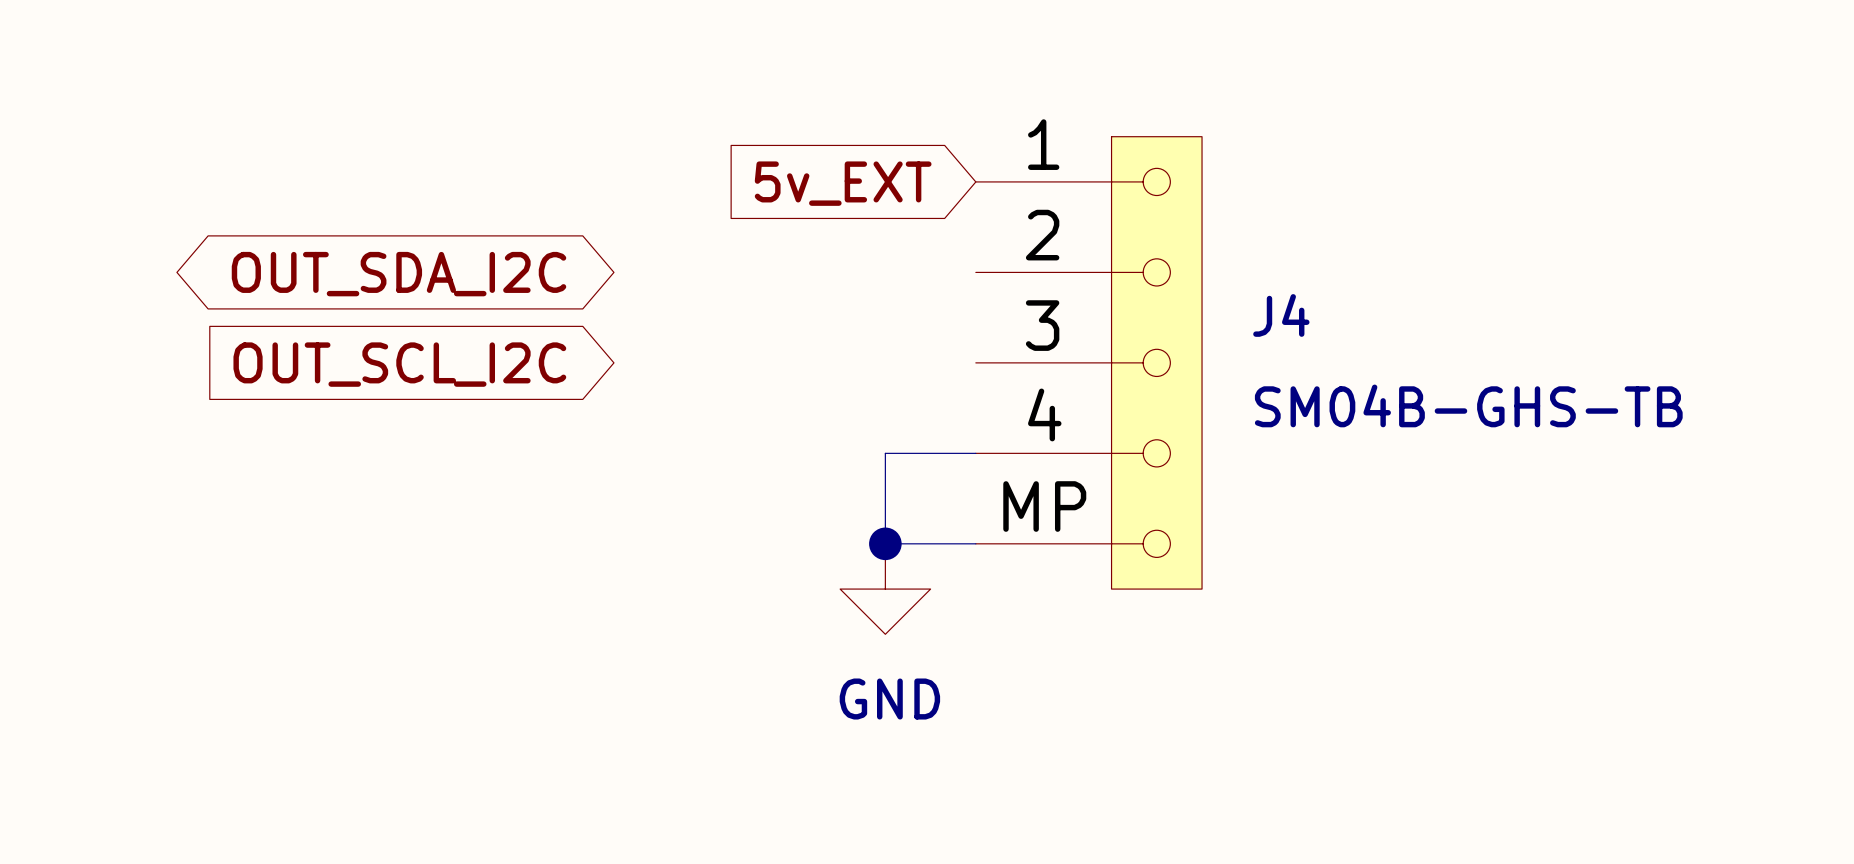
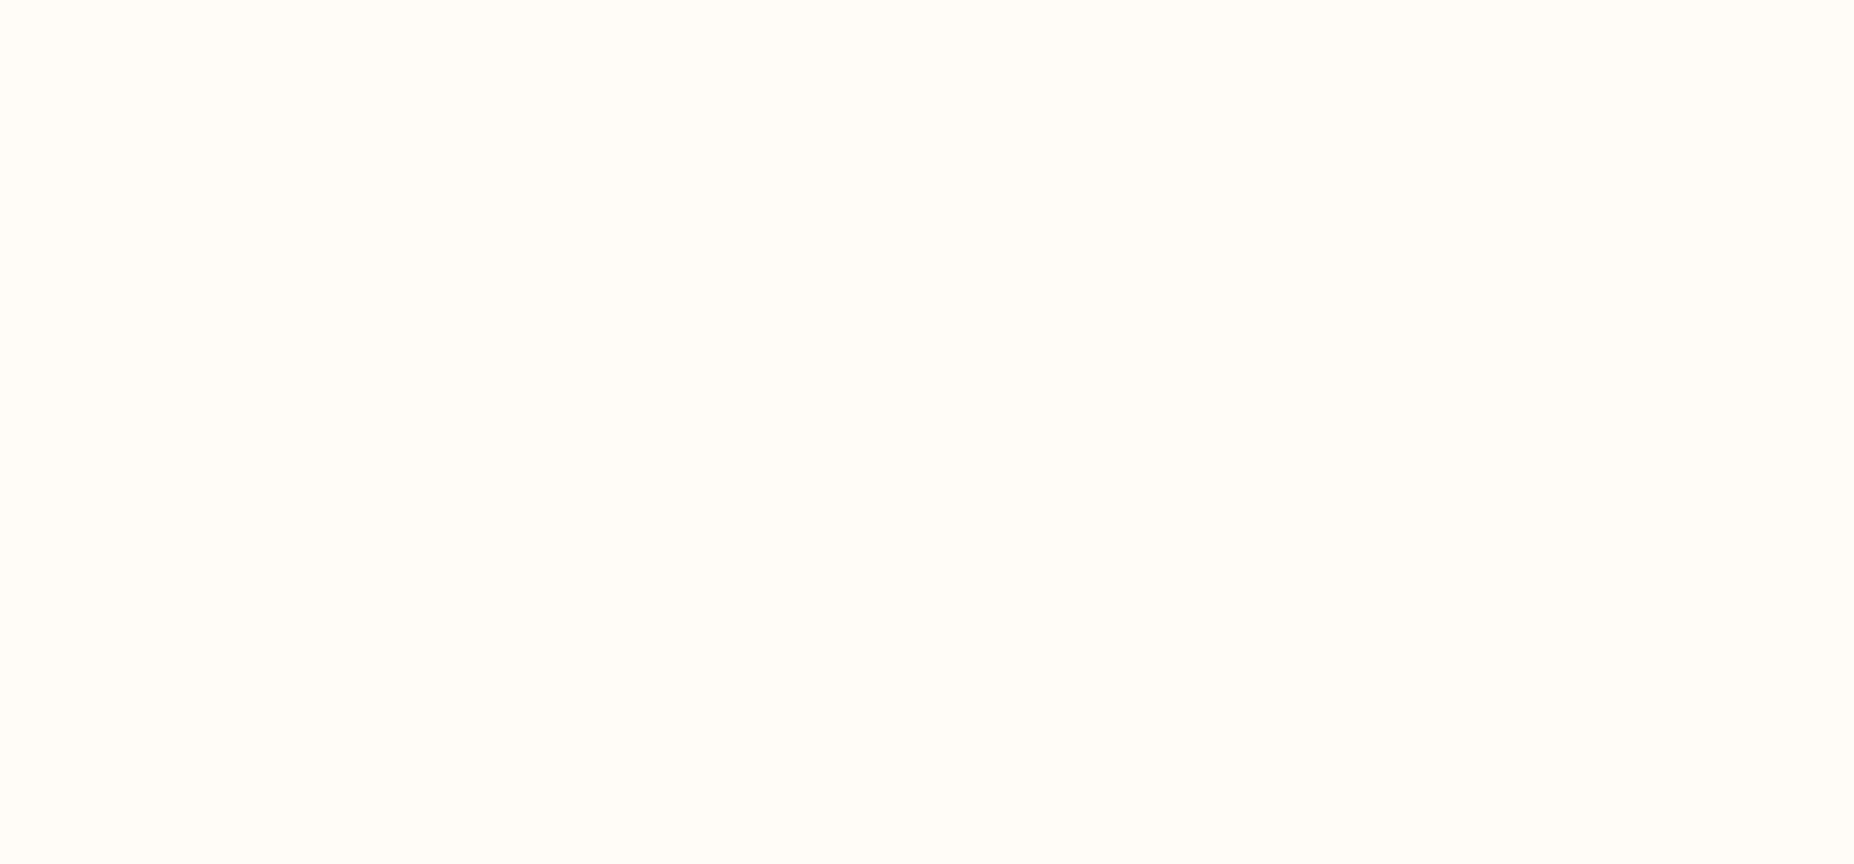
global label: 5v_EXT (843, 183) -> none
global label: OUT_SDA_I2C (399, 274) -> none
J4: SM04B-GHS-TB (1088, 362) -> none
global label: OUT_SCL_I2C (399, 364) -> none
wire: (975, 453) (885, 453) (885, 543) (975, 543) -> none
junction: (885, 543) -> none
power symbol: GND (885, 589) -> none

